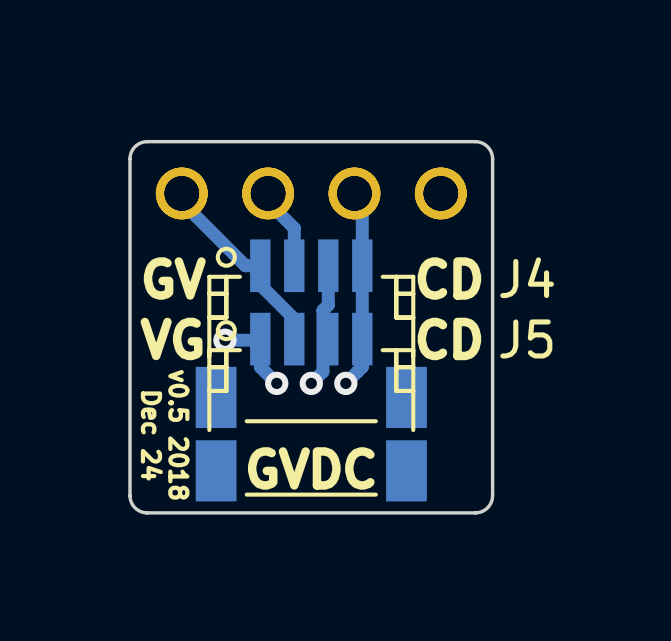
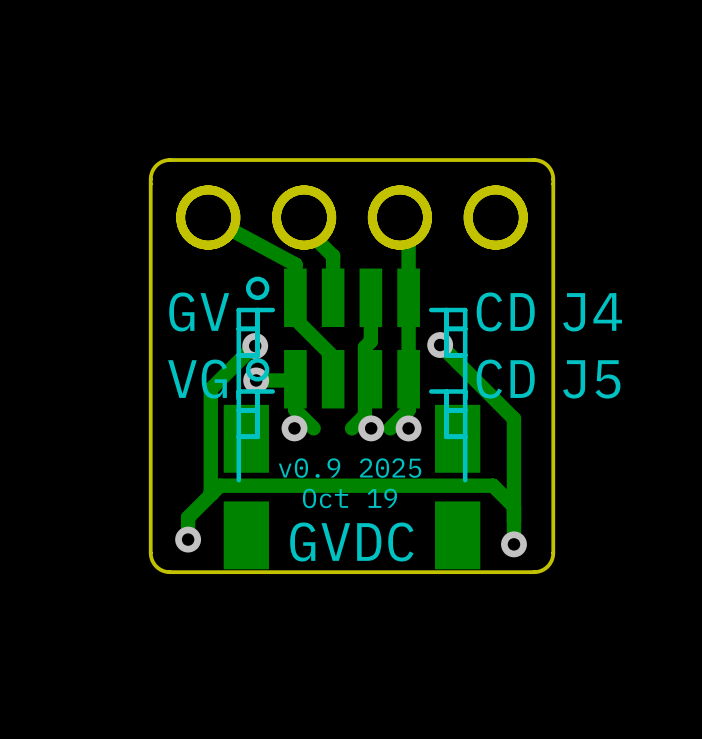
track: (173, 193) (245, 265) (260, 265) -> (198, 217) (208, 217) (295, 264) (295, 297)
part: (311, 193) -> none
part: (311, 193) -> none
part: none -> (352, 217)
part: none -> (352, 217)
J4 footprint: [195, 239, 427, 429] -> [223, 268, 481, 473]
track: none -> (440, 345) (513, 418) (513, 544)
via: none -> (440, 345)
track: none -> (255, 345) (210, 389) (212, 493)
via: none -> (255, 345)
J5 footprint: [195, 312, 427, 502] -> [223, 350, 481, 570]
via position: (276, 383) -> (294, 428)
via: (311, 383) -> none
via: none -> (371, 428)
via: (345, 383) -> none
via: none -> (408, 428)
text: none -> v0.9 2025 (350, 468)
text: v0.5 2018 (178, 434) -> none
text: Dec 24 (151, 436) -> none
text: none -> Oct 19 (349, 498)
track: none -> (513, 506) (493, 485) (219, 485) (188, 517) (188, 539)
text position: GVDC (311, 468) -> GVDC (351, 542)
via: none -> (188, 539)
via: none -> (513, 544)

